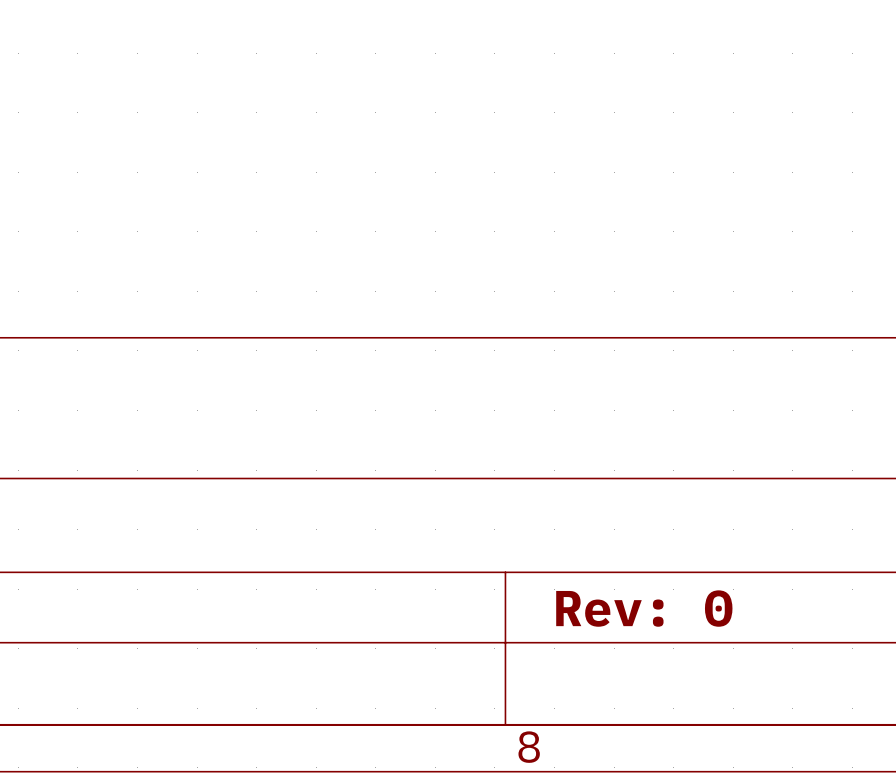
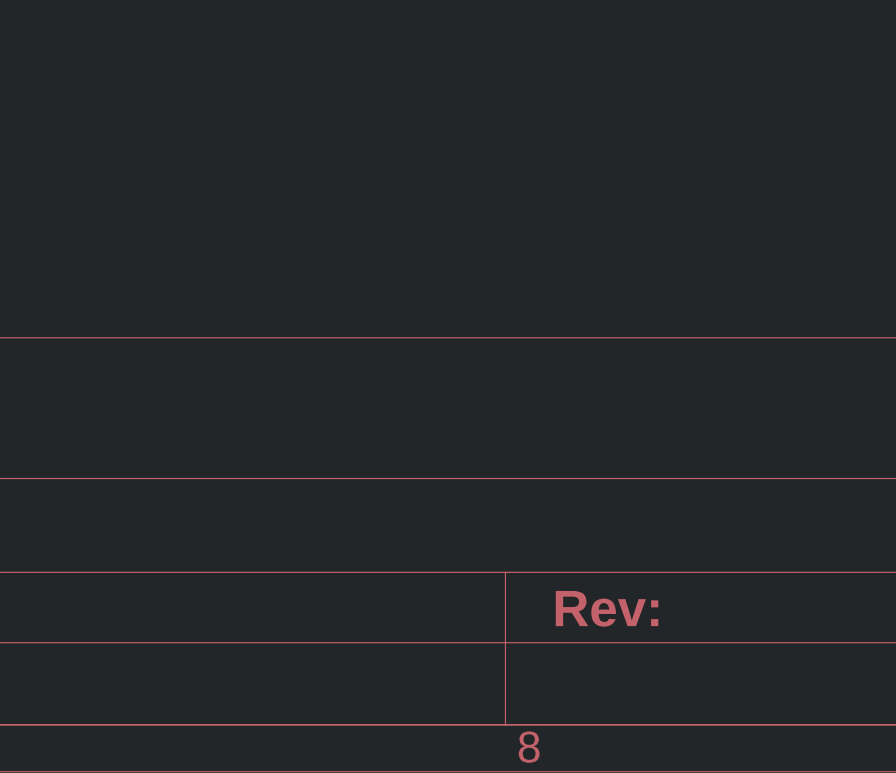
title block: Rev: 0 (644, 608) -> Rev: (607, 608)

